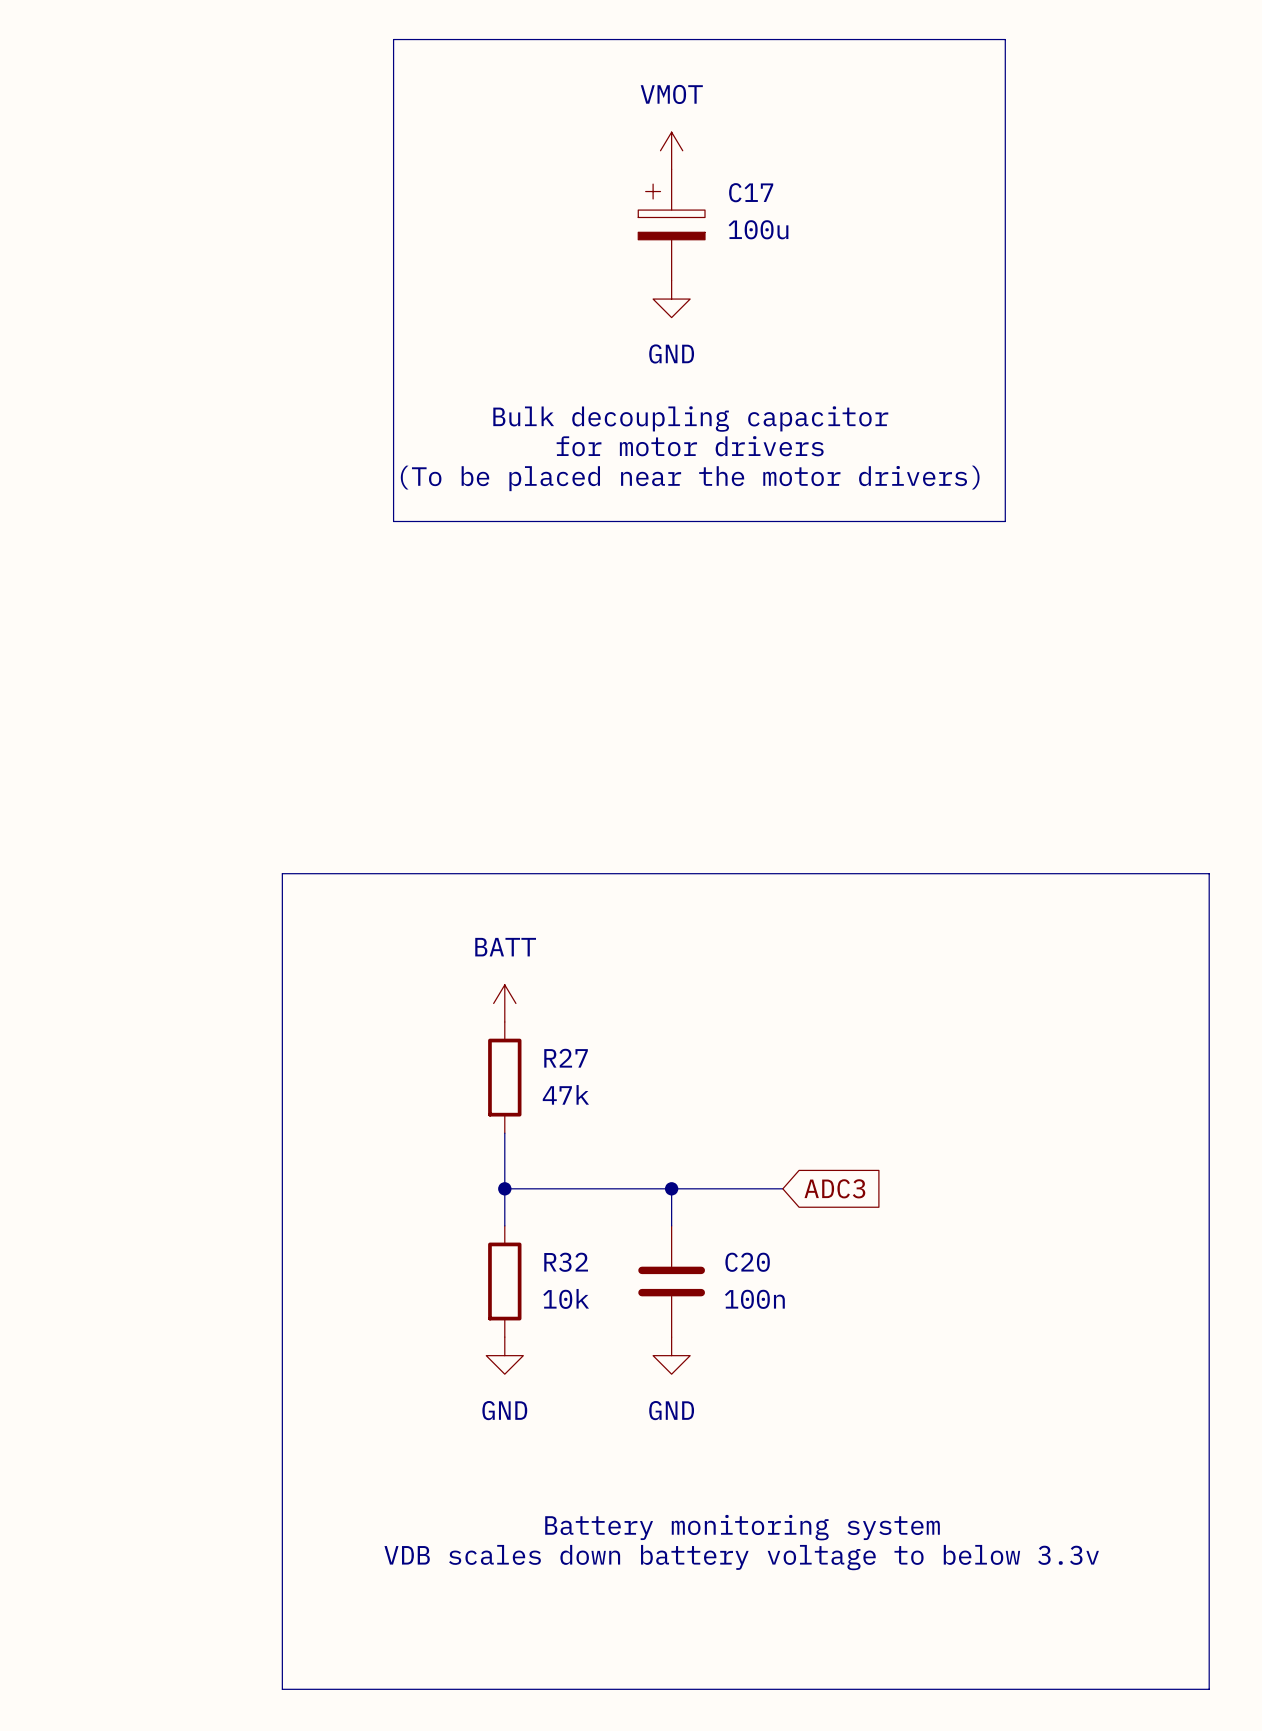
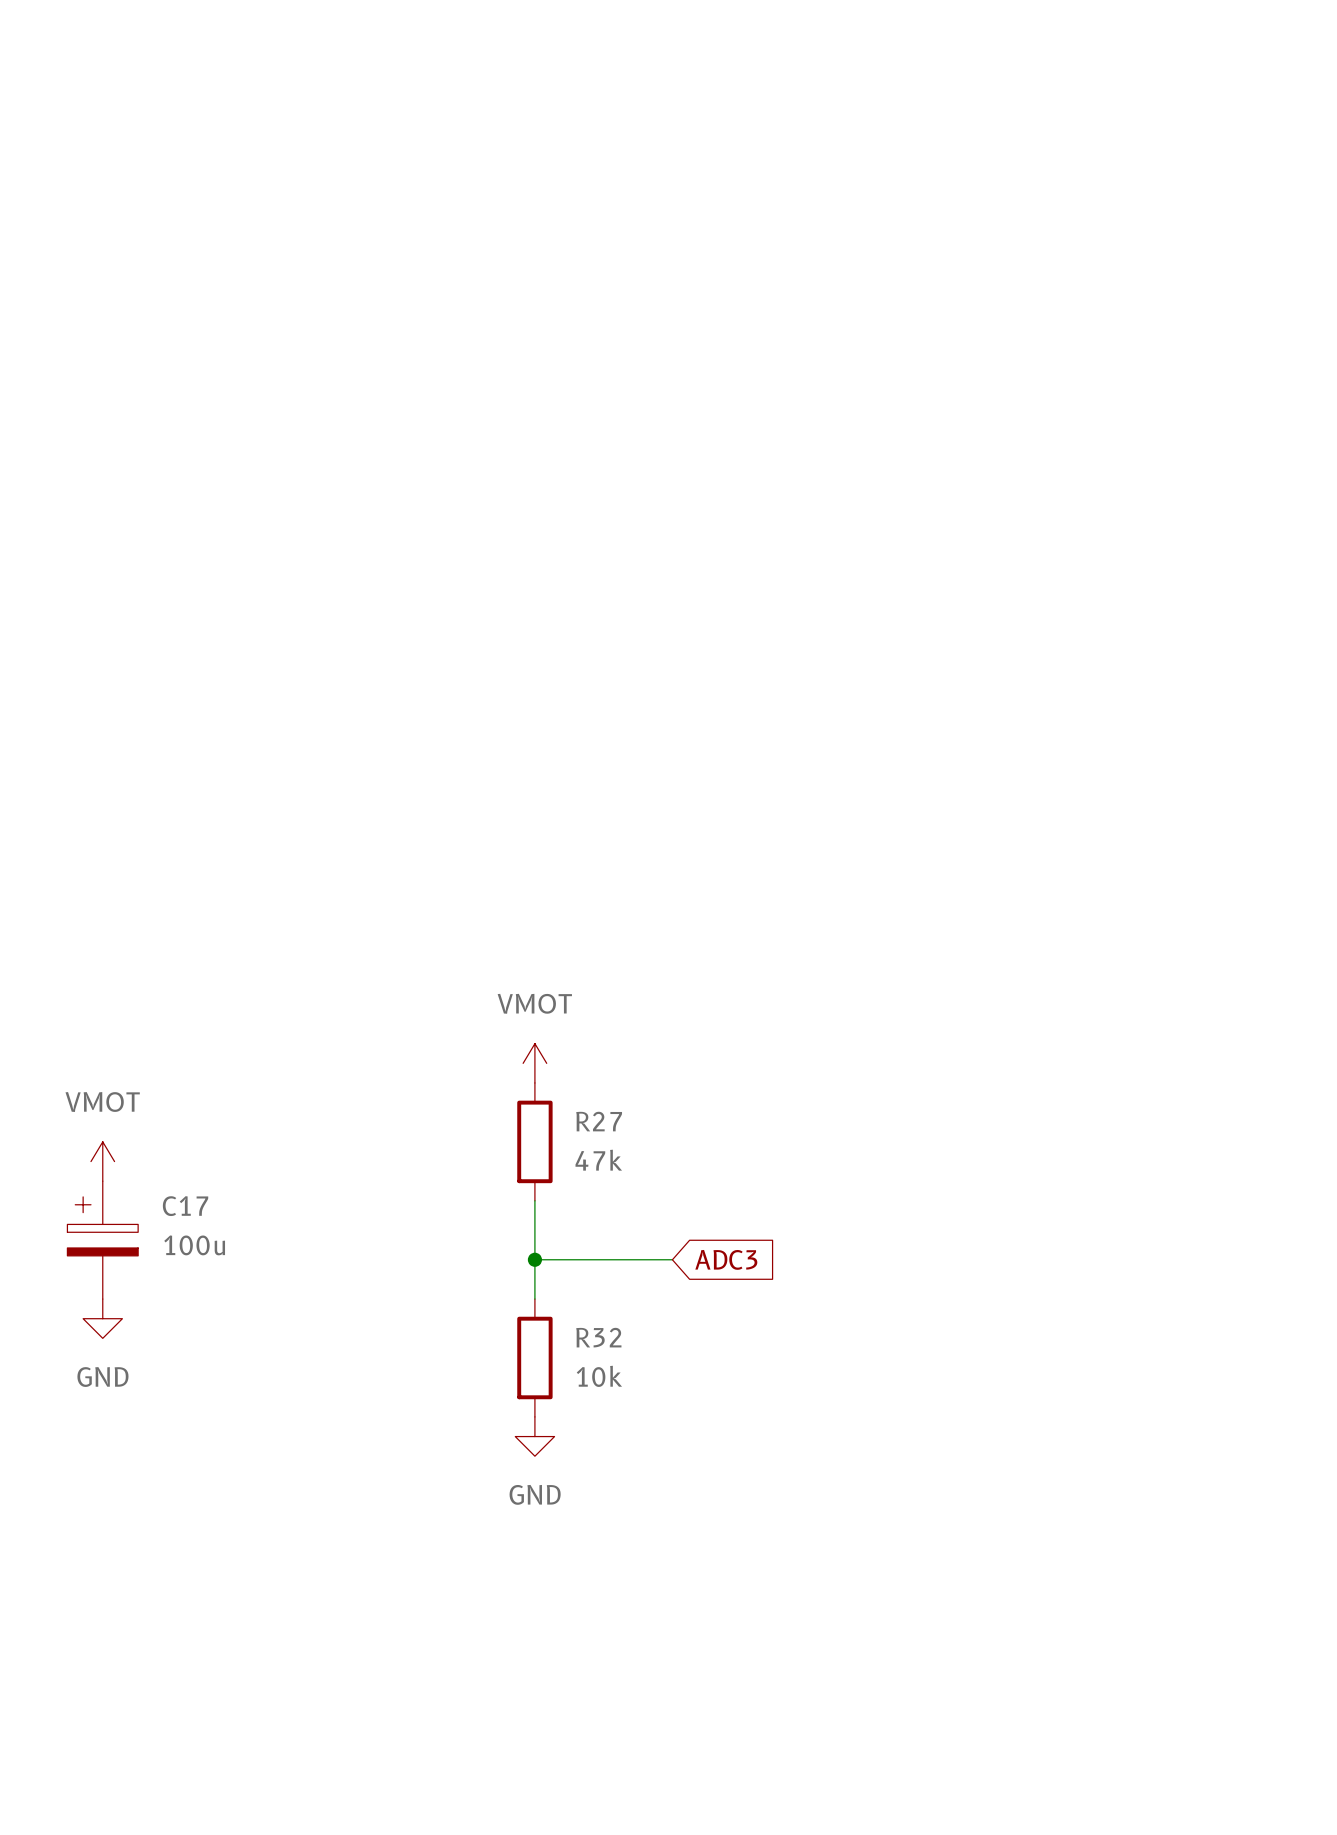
line: (393, 39) (1005, 39) (1005, 521) (393, 521) (393, 39) -> none
power symbol: VMOT (671, 150) -> none
C17 position: (671, 224) -> (102, 1240)
power symbol: GND (671, 299) -> none
text: Bulk decoupling capacitor (690, 419) -> none
text: for motor drivers (690, 446) -> none
text: (To be placed near the motor drivers) (690, 478) -> none
line: (282, 873) (1209, 873) (1209, 1689) (282, 1689) (282, 873) -> none
power symbol: BATT (504, 1003) -> VMOT (534, 1063)
power symbol: none -> VMOT (102, 1161)
wire: (634, 1188) (782, 1188) -> none
wire: (671, 1188) (671, 1225) -> none
junction: (671, 1188) -> none
global label position: ADC3 (834, 1188) -> ADC3 (726, 1259)
power symbol: none -> GND (102, 1318)
C20: 100n (671, 1281) -> none
power symbol: GND (671, 1355) -> none
text: Battery monitoring system (742, 1527) -> none
text: VDB scales down battery voltage to below 3.3v (741, 1557) -> none

